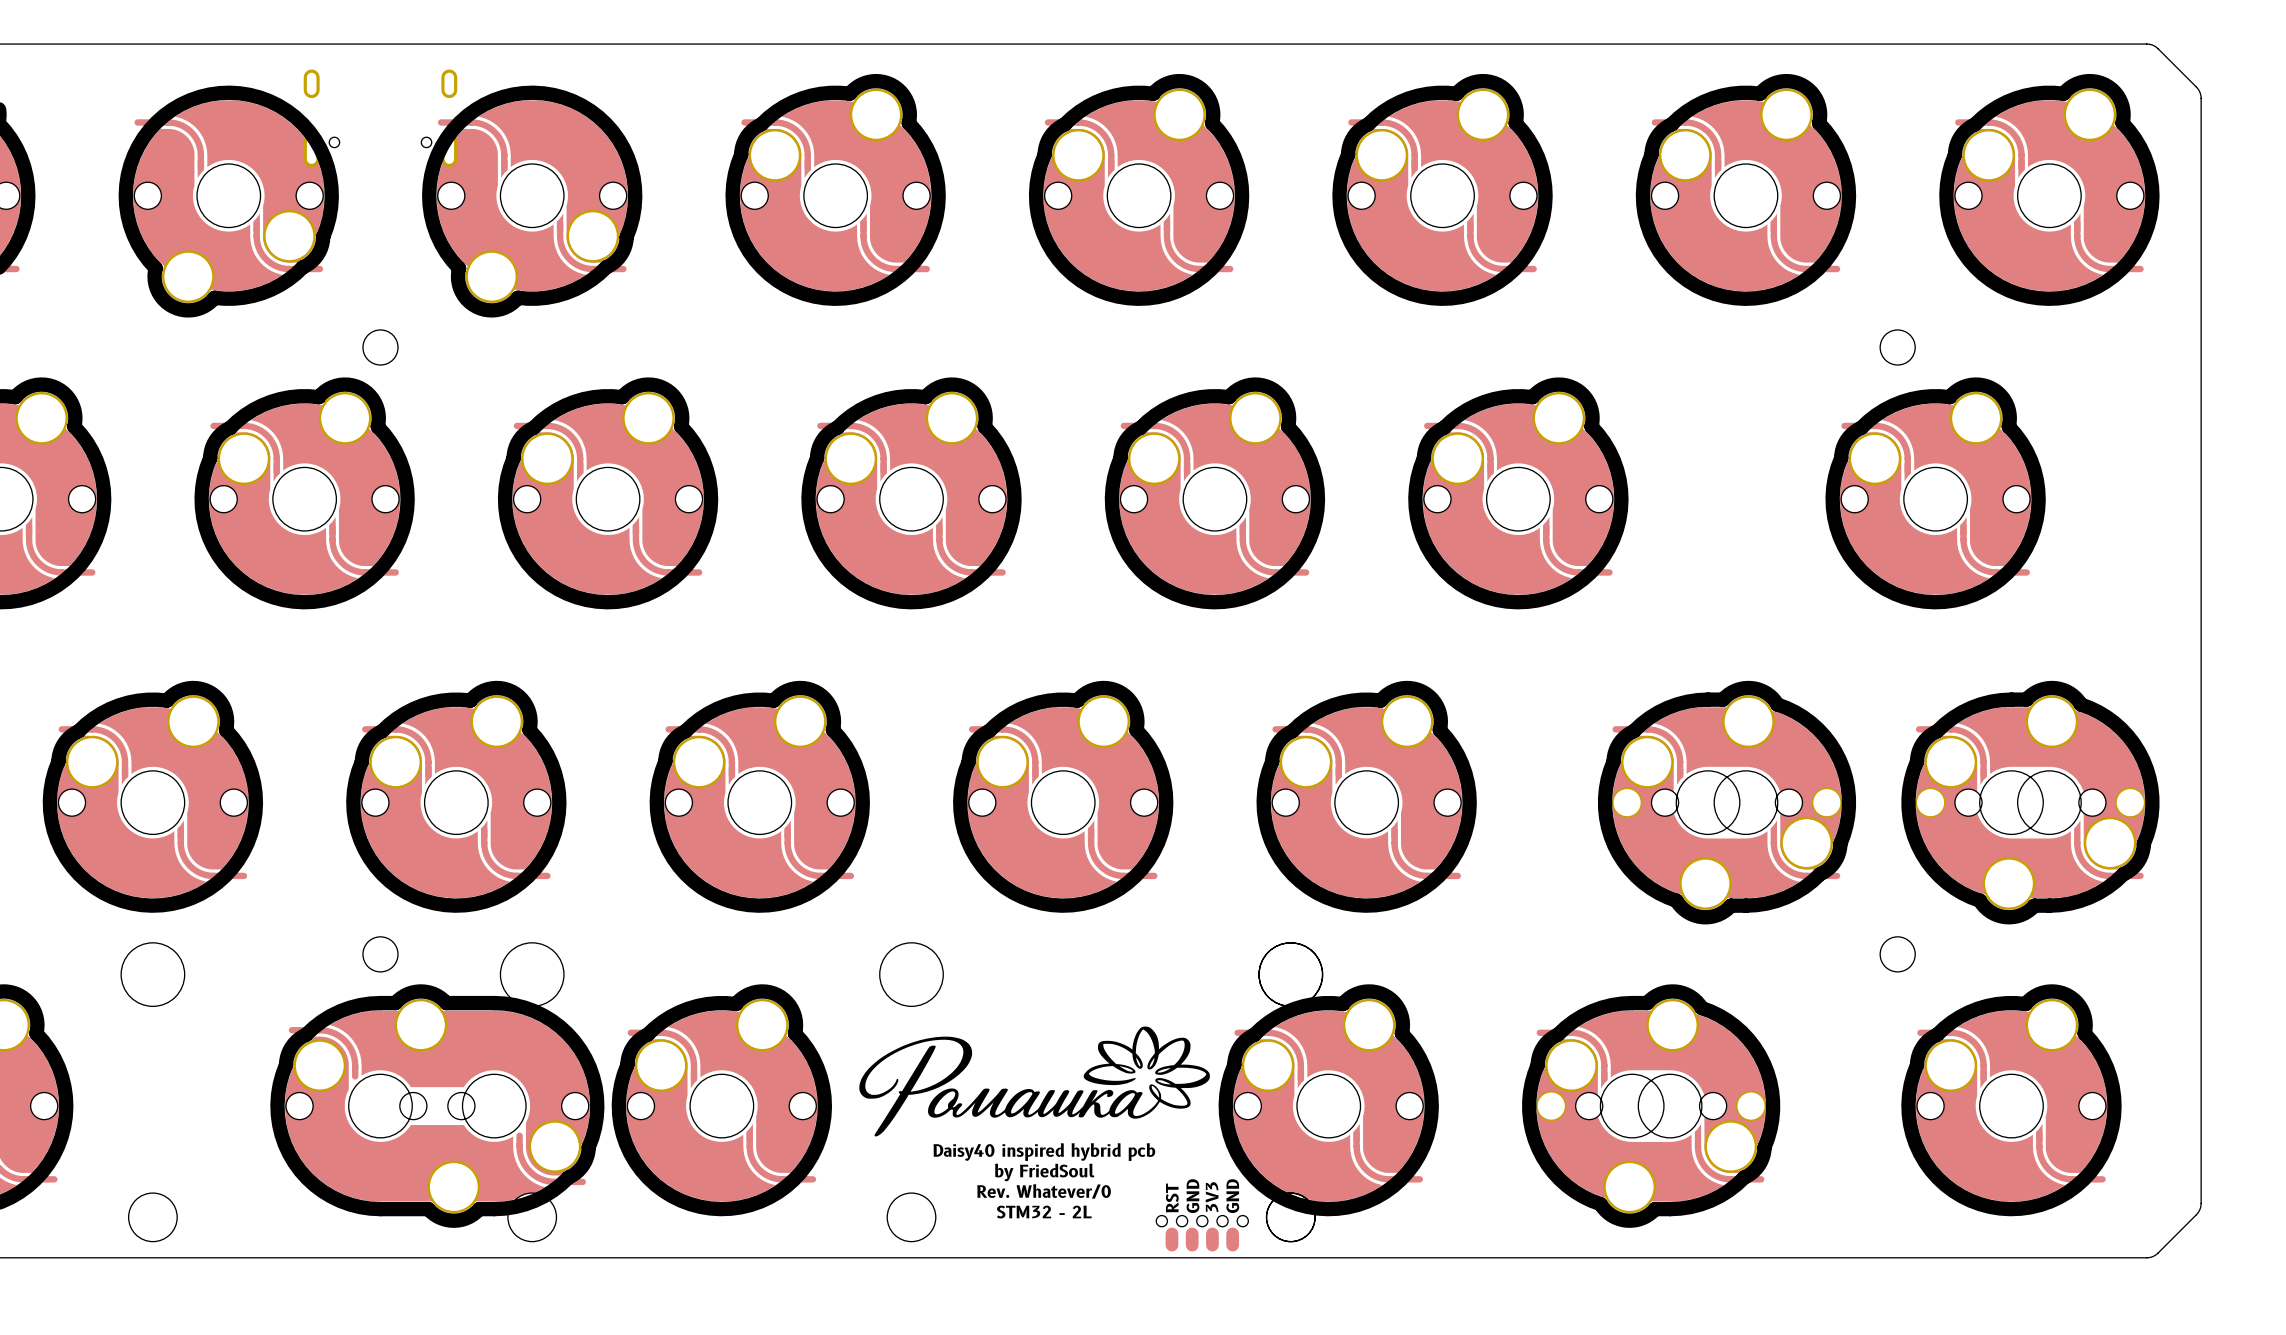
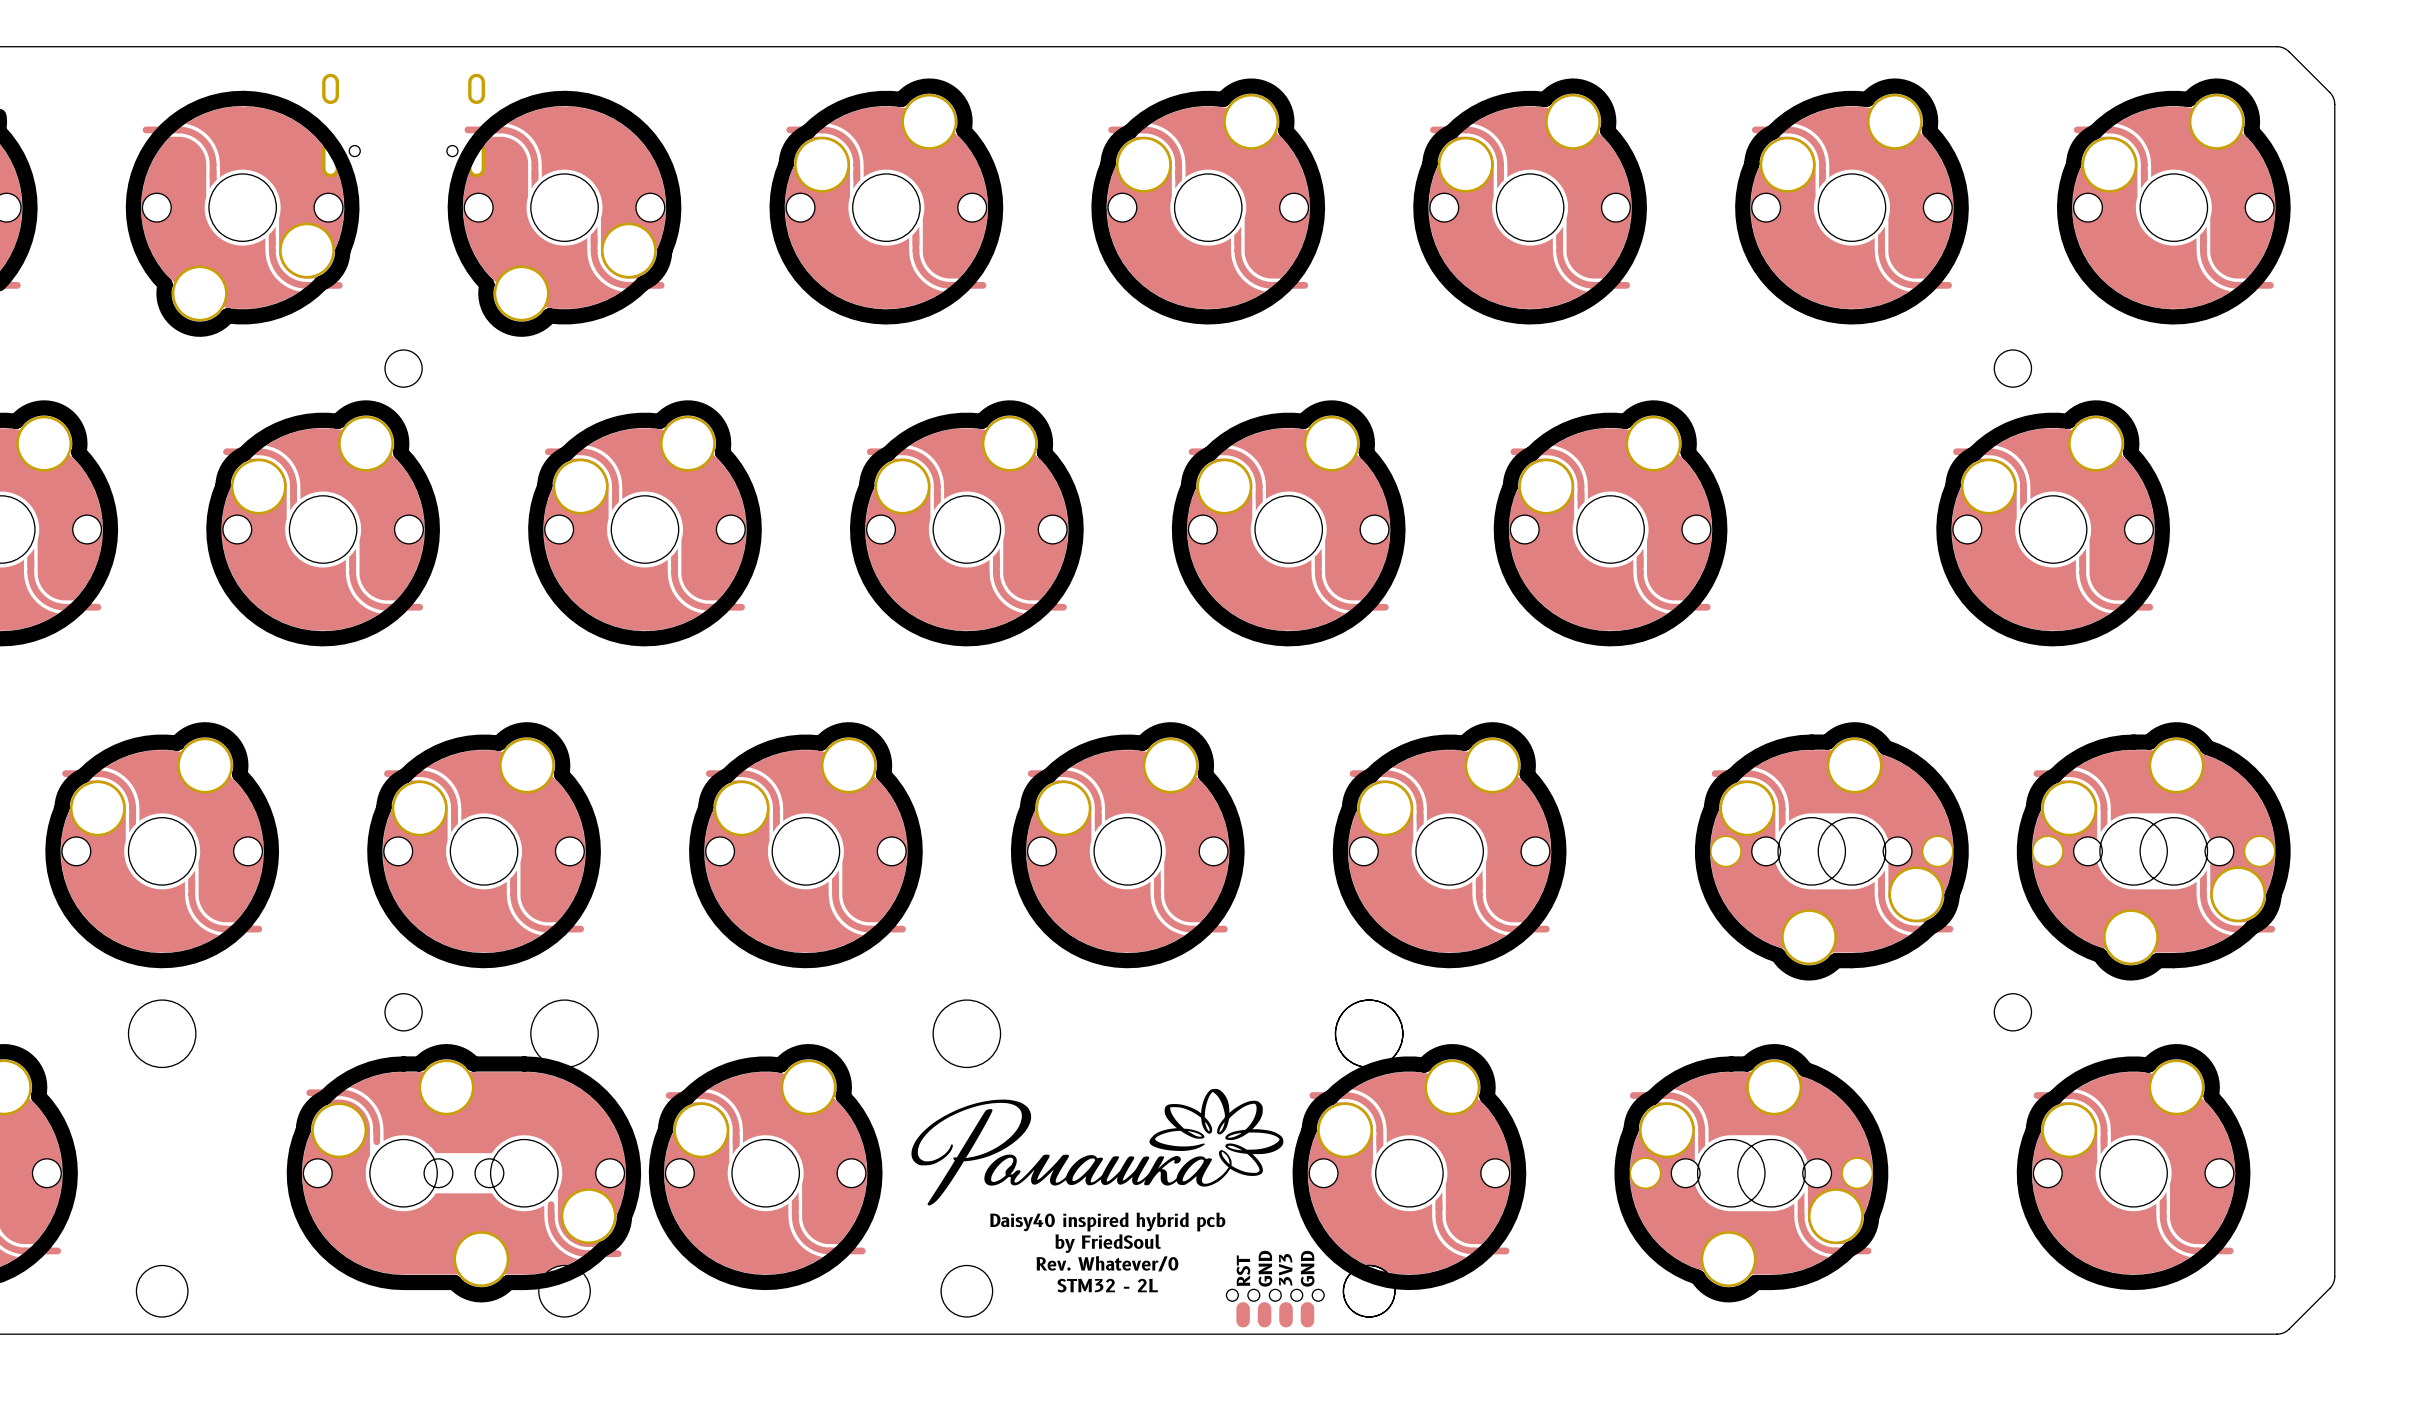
part rotation: 0° (1727, 802) -> 180° (1831, 851)
part rotation: 0° (2030, 802) -> 180° (2153, 851)

